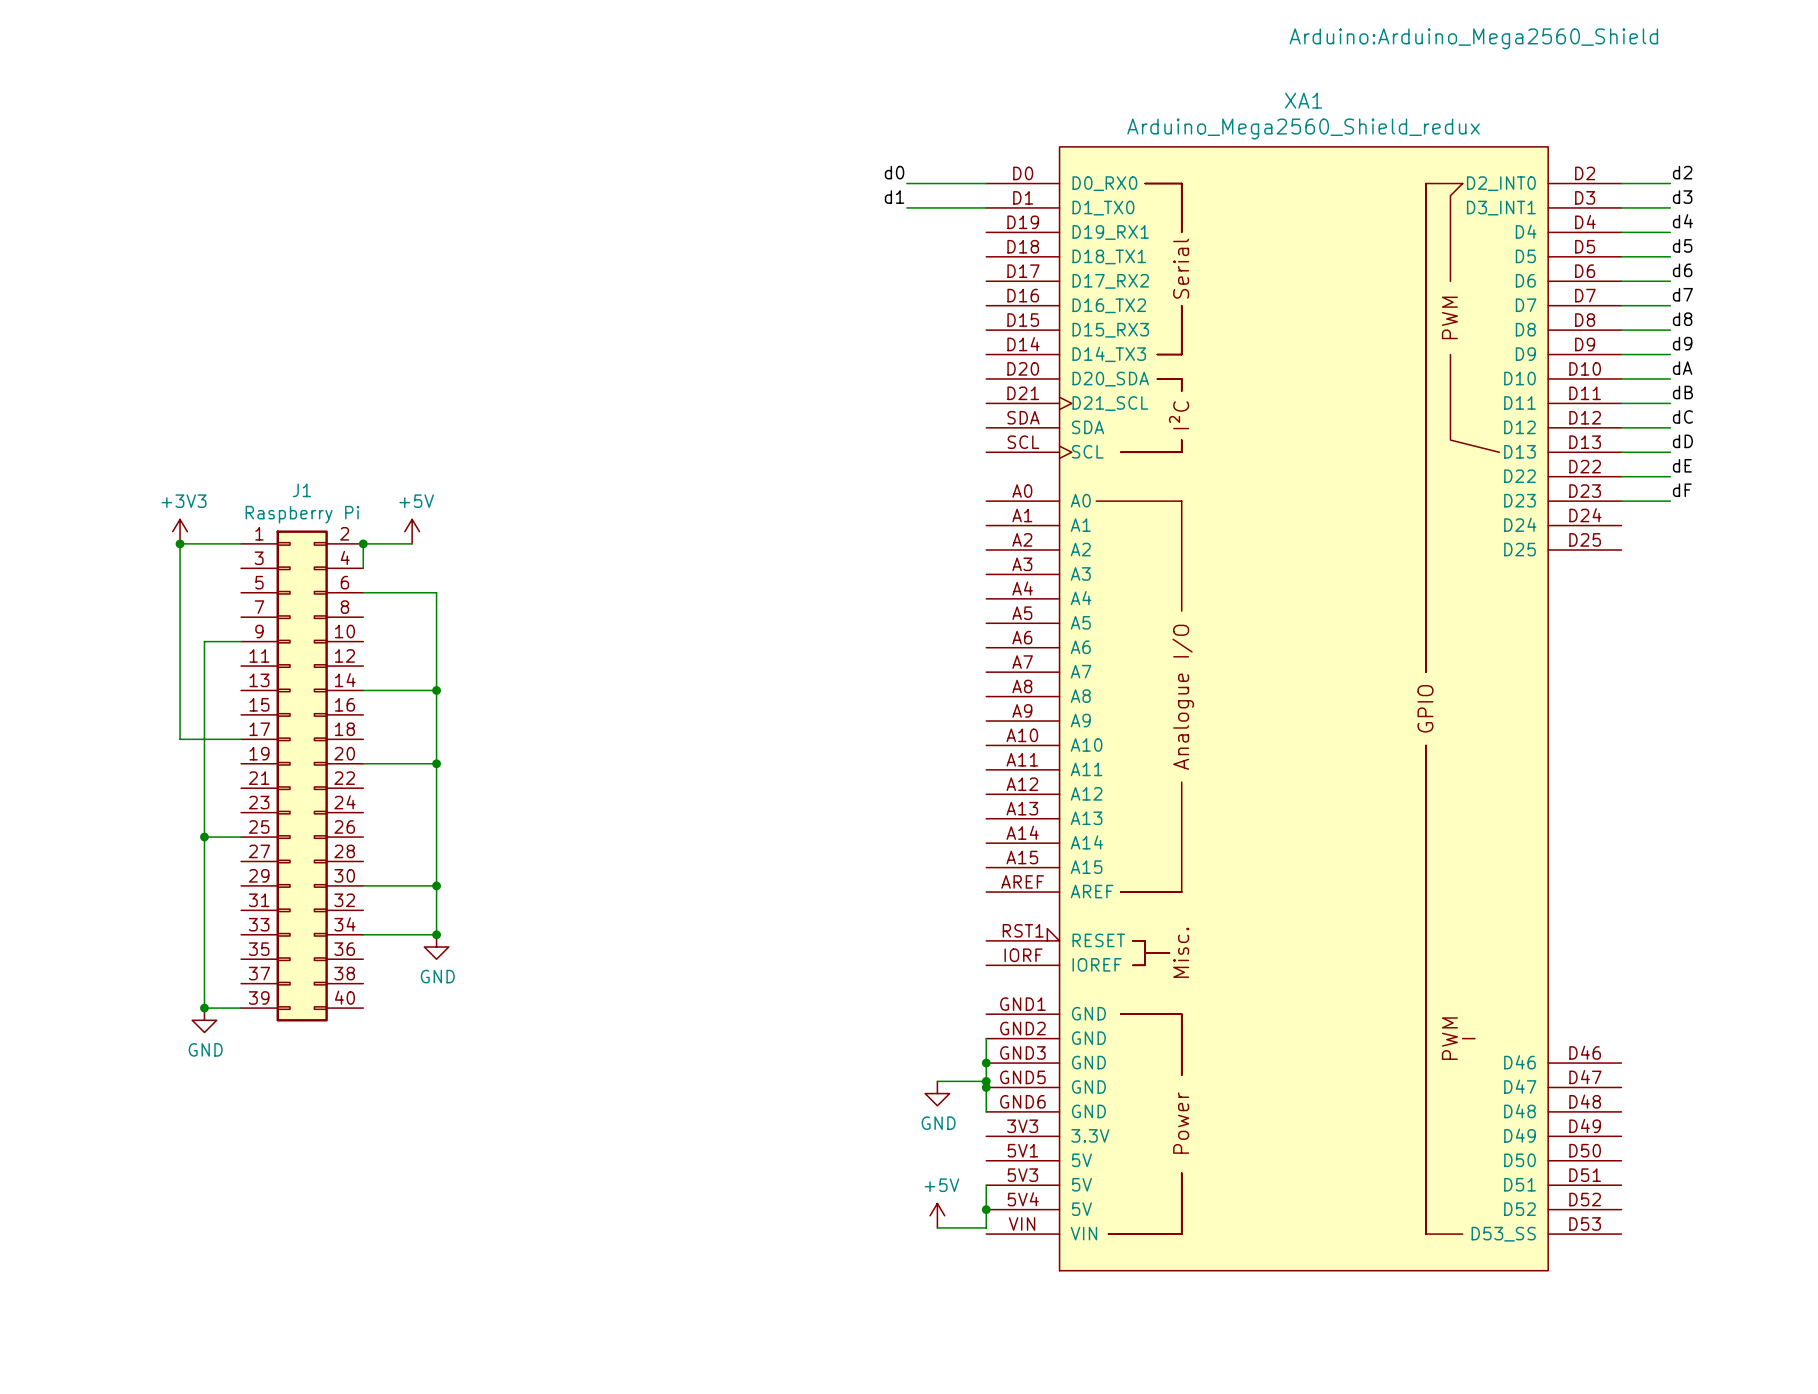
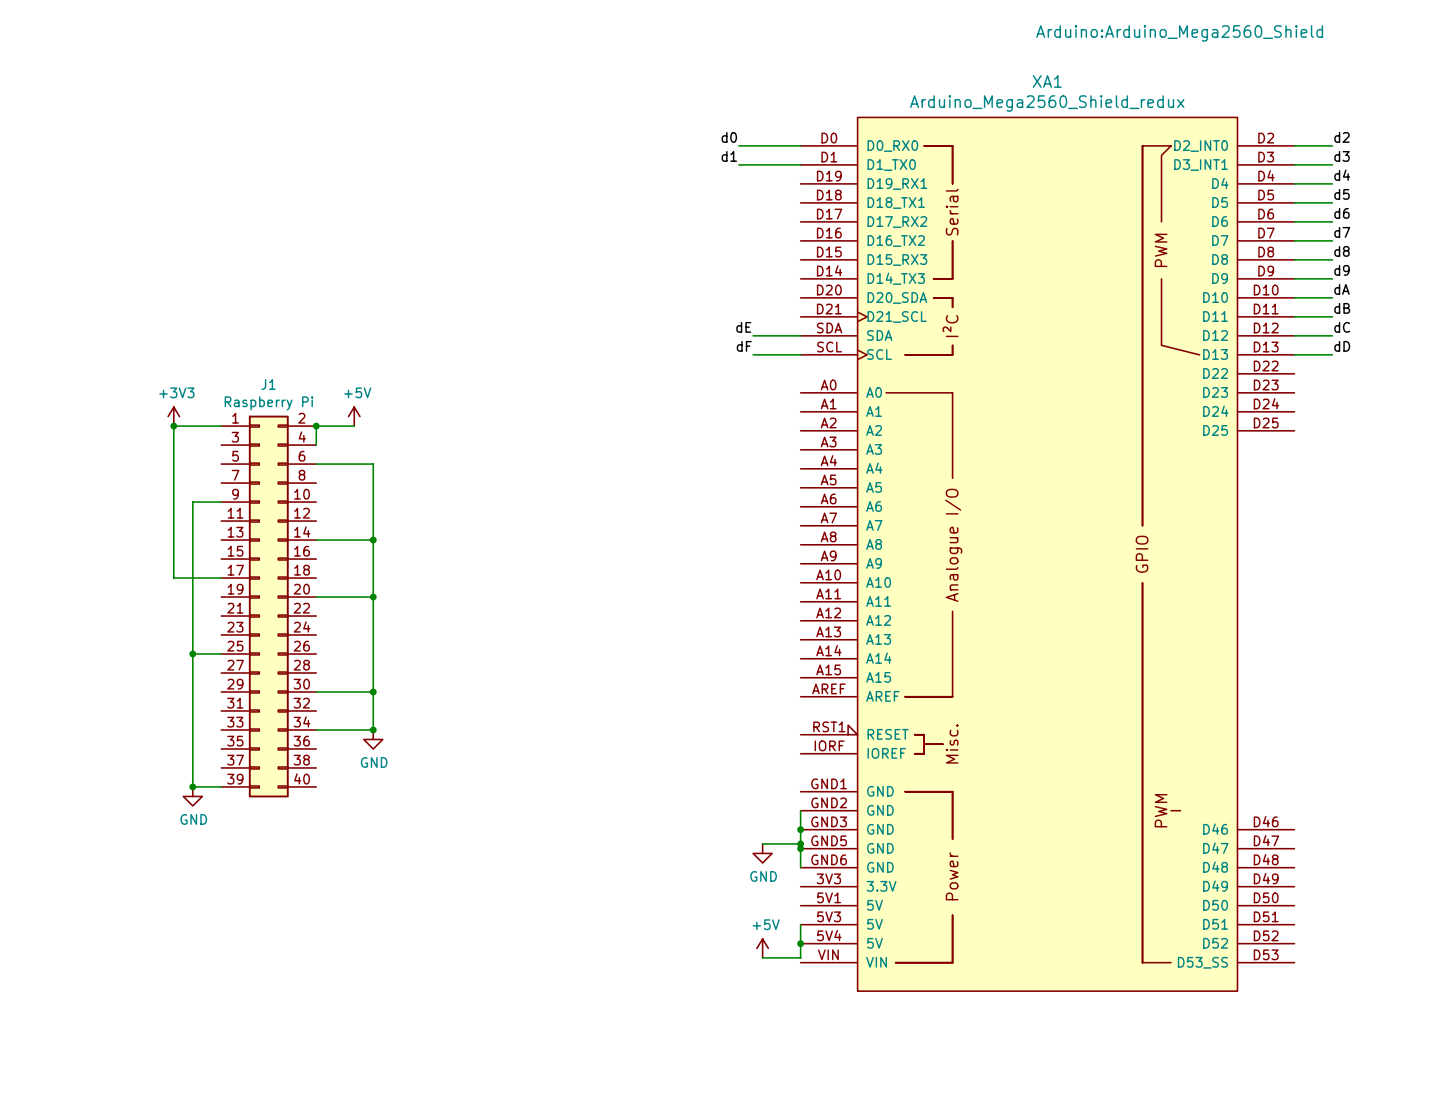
label: none -> dE (743, 327)
wire: none -> (753, 335) (800, 335)
label: none -> dF (744, 346)
wire: none -> (753, 354) (800, 354)
label: dE (1682, 465) -> none
wire: (1621, 476) (1670, 476) -> none
label: dF (1682, 490) -> none
wire: (1621, 501) (1670, 501) -> none

